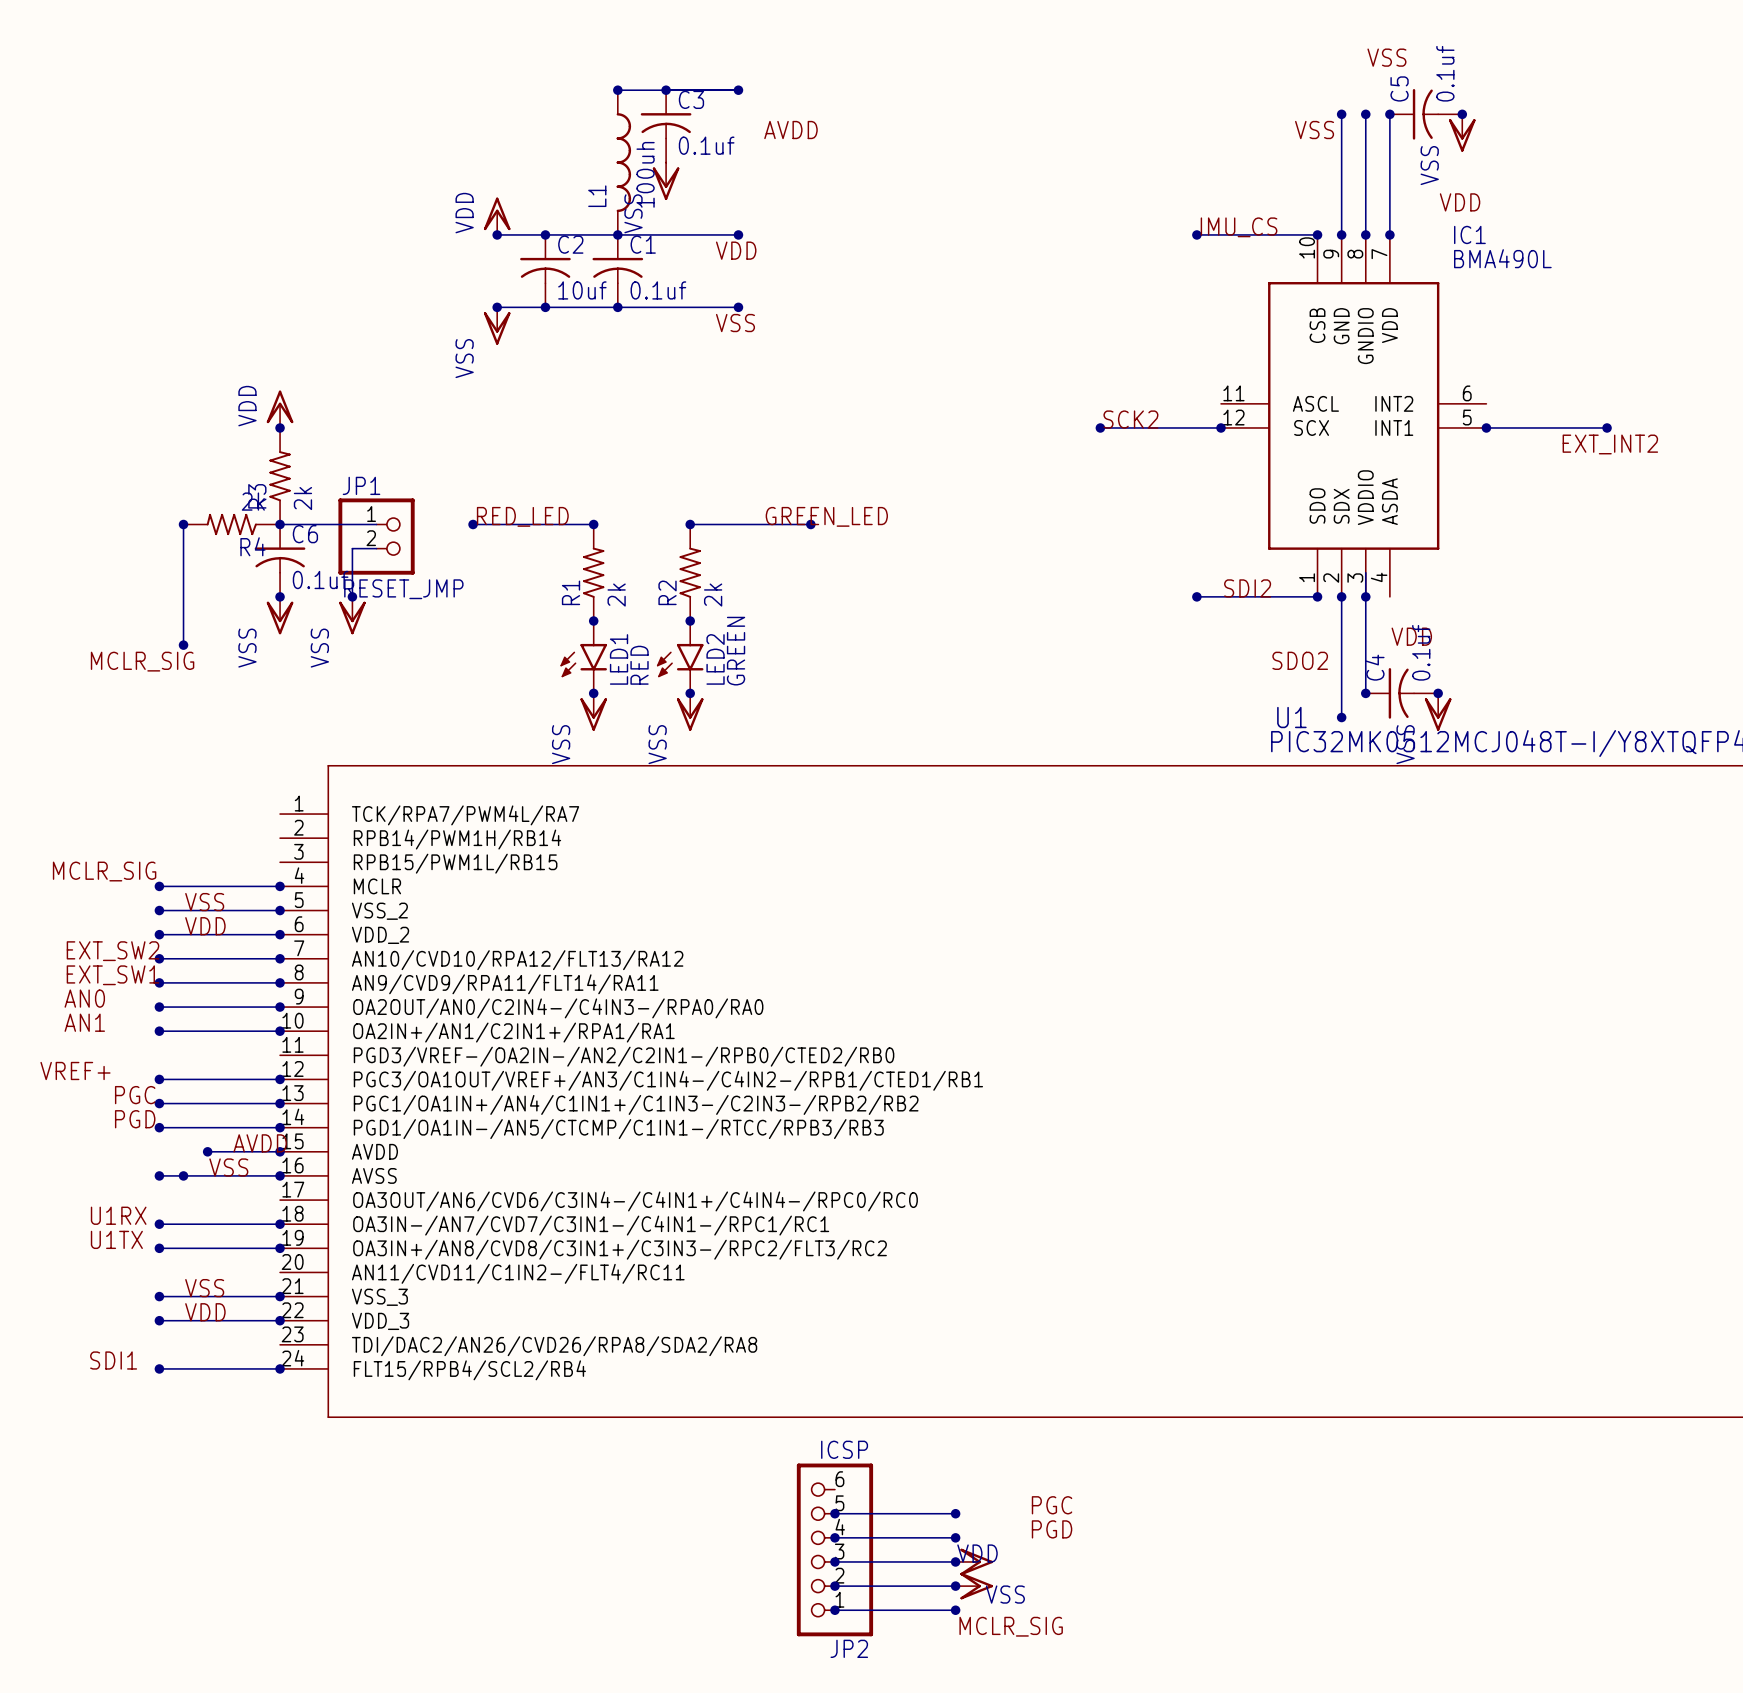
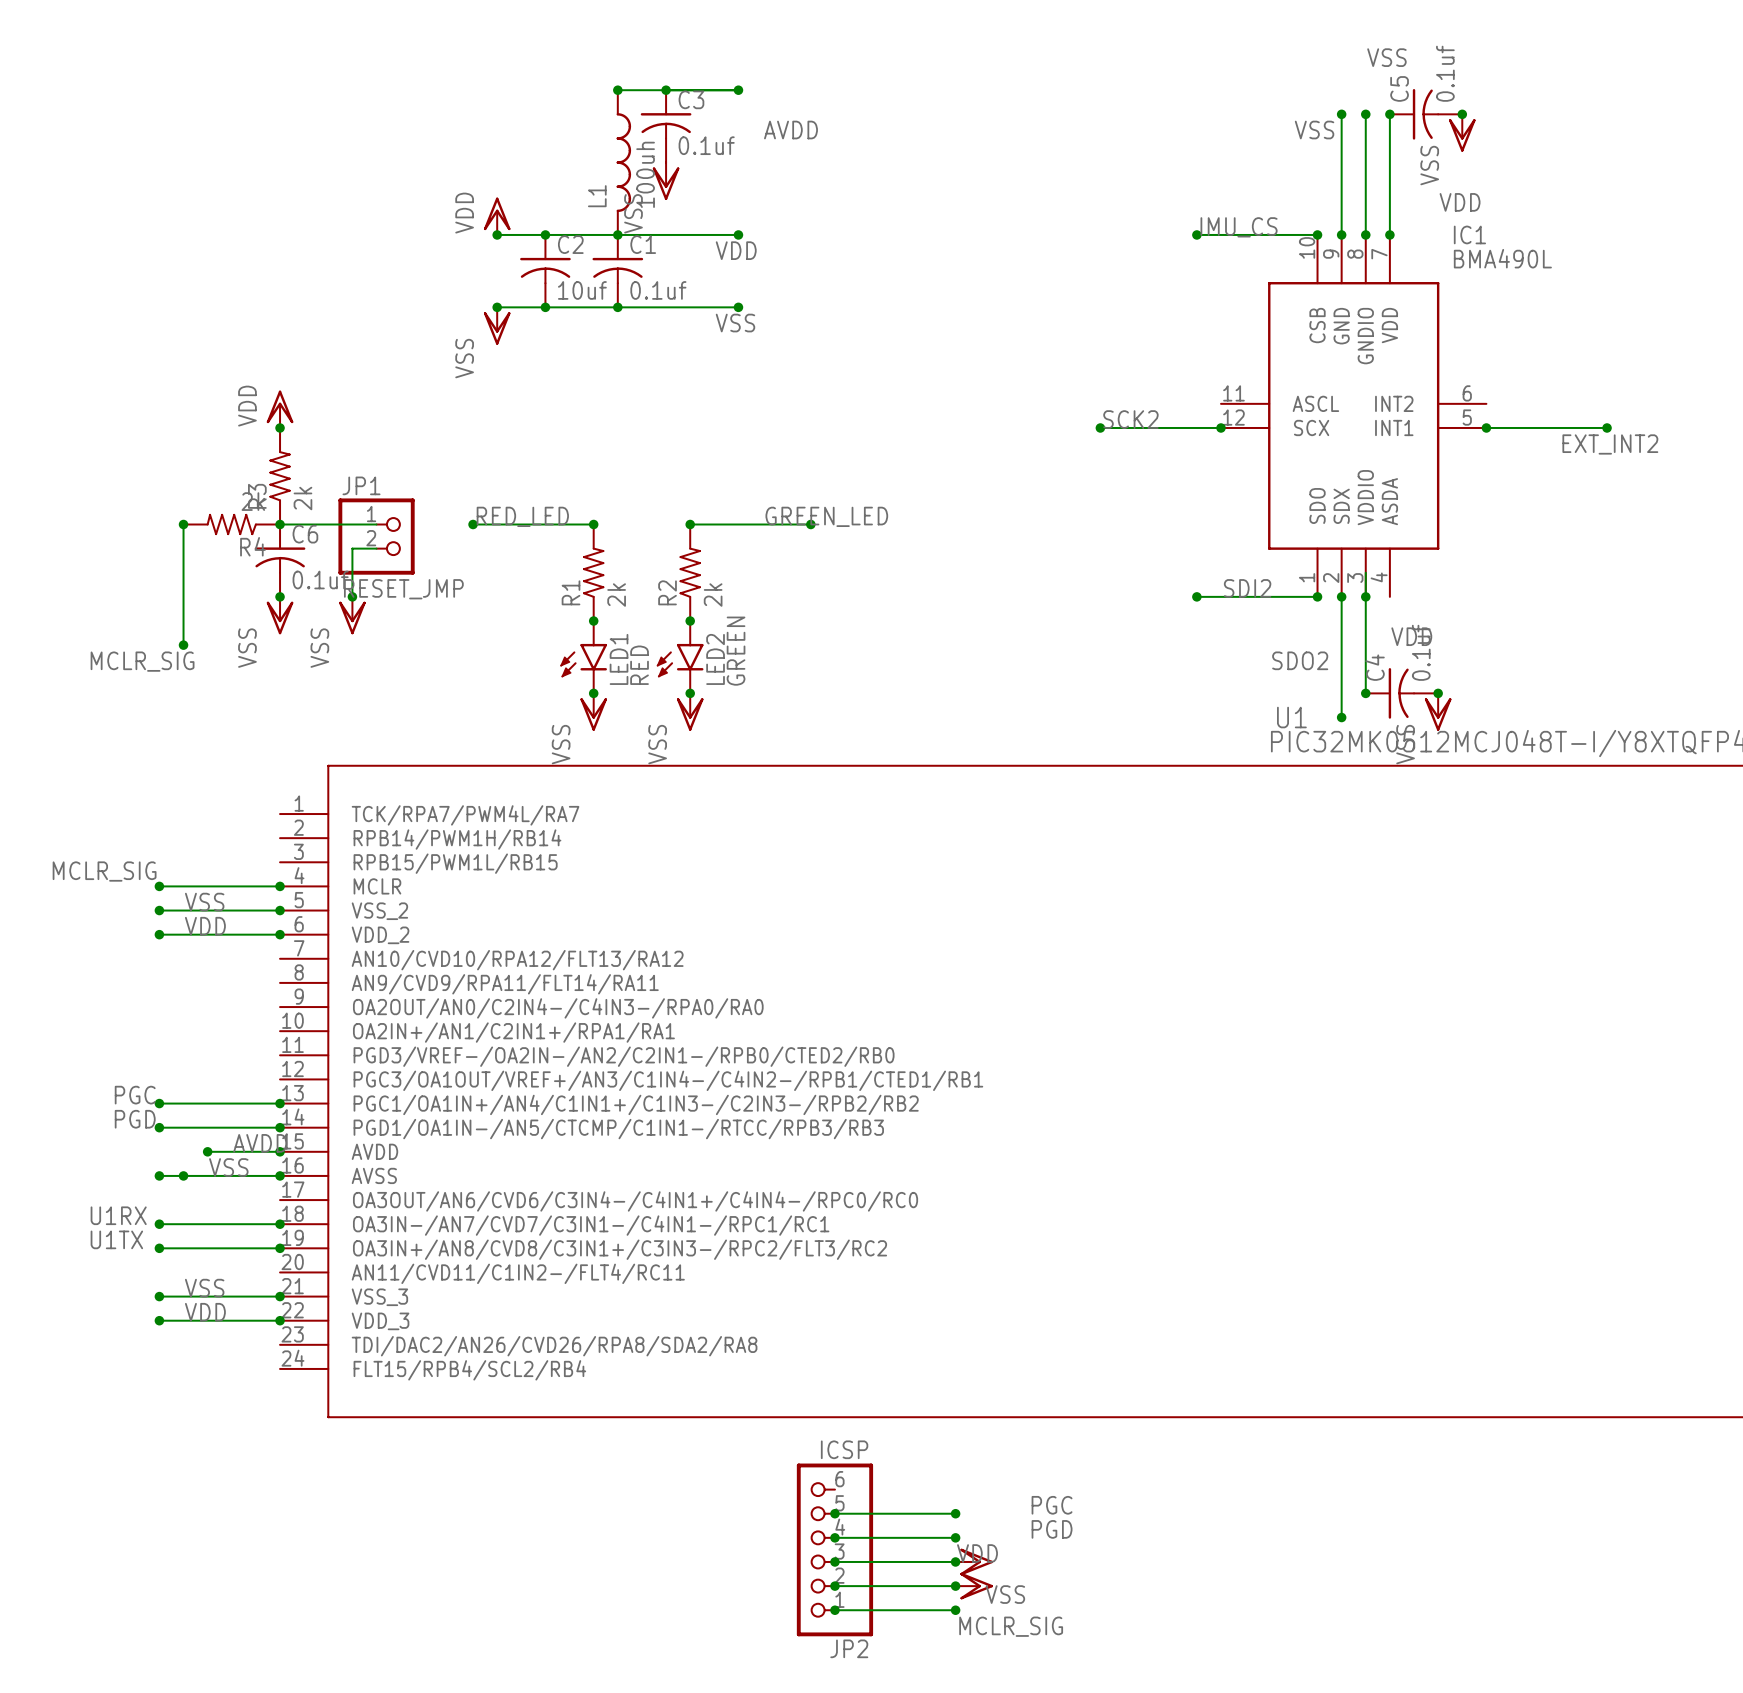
label: EXT_SW2 (113, 951) -> none
wire: (159, 958) (280, 958) -> none
junction: (159, 958) -> none
junction: (280, 958) -> none
label: EXT_SW1 (113, 975) -> none
wire: (159, 982) (280, 982) -> none
junction: (159, 982) -> none
junction: (280, 982) -> none
label: AN0 (84, 998) -> none
wire: (159, 1007) (280, 1007) -> none
junction: (159, 1007) -> none
junction: (280, 1007) -> none
label: AN1 (84, 1022) -> none
wire: (159, 1031) (280, 1031) -> none
junction: (159, 1031) -> none
junction: (280, 1031) -> none
label: VREF+ (75, 1070) -> none
wire: (159, 1079) (280, 1079) -> none
junction: (159, 1079) -> none
junction: (280, 1079) -> none
label: SDI1 (113, 1360) -> none
wire: (159, 1368) (280, 1368) -> none
junction: (159, 1368) -> none
junction: (280, 1368) -> none

